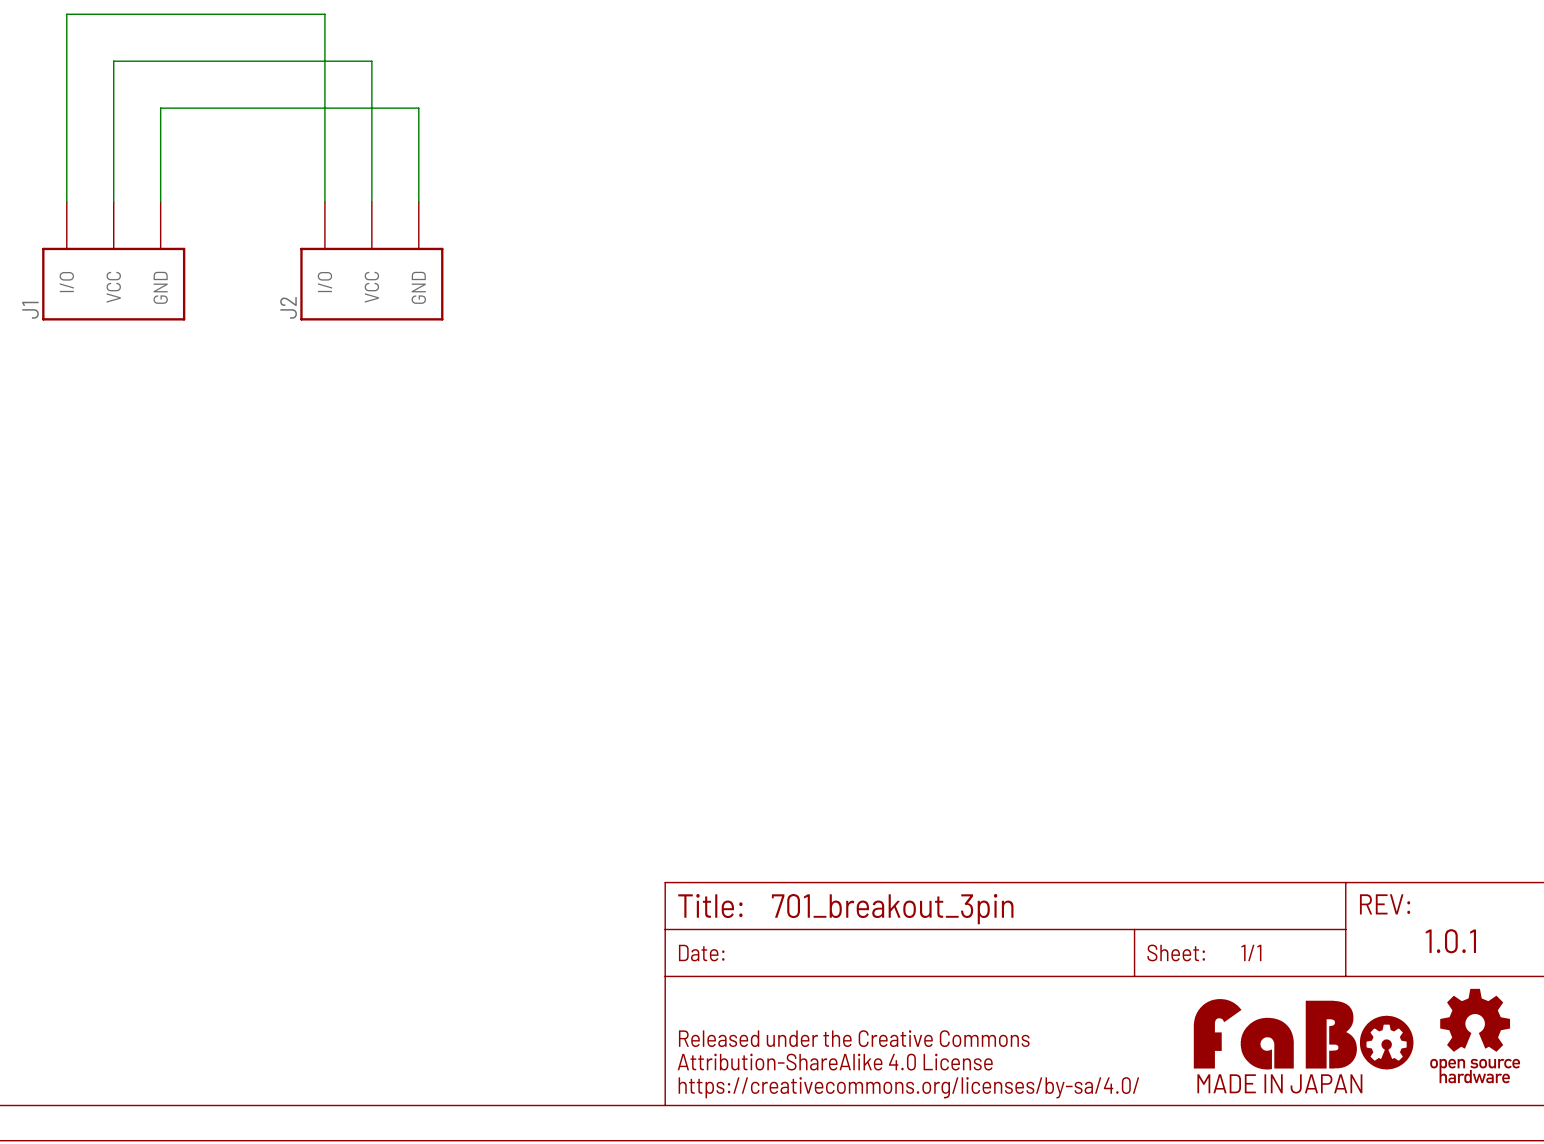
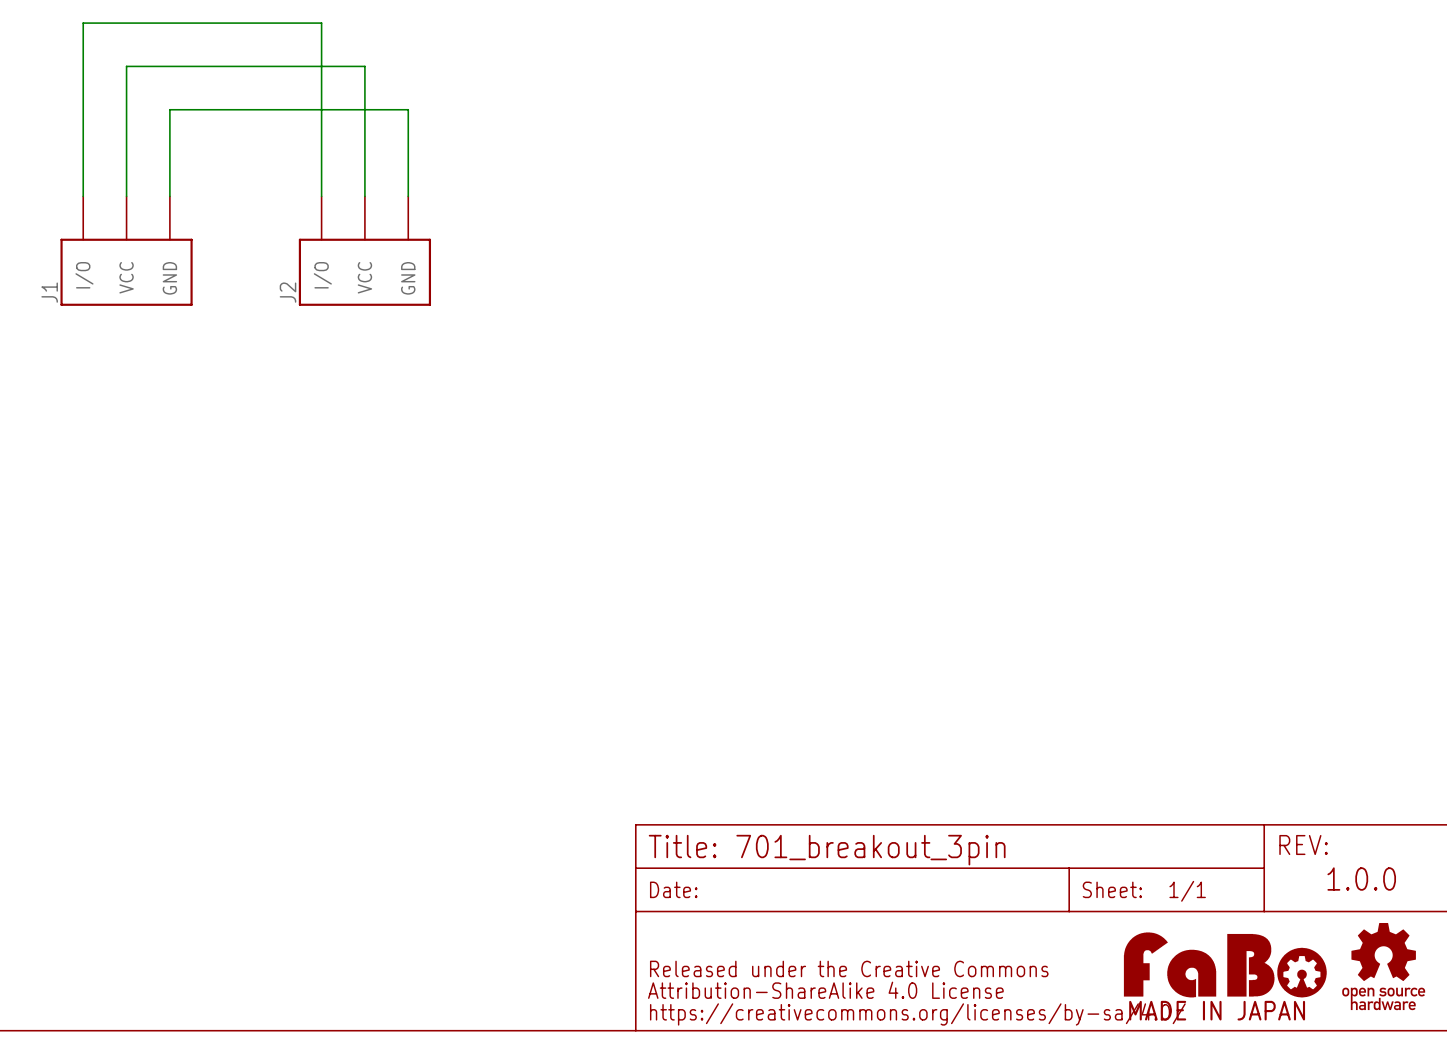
text: 1.0.1 (1450, 941) -> 1.0.0 (1361, 879)

